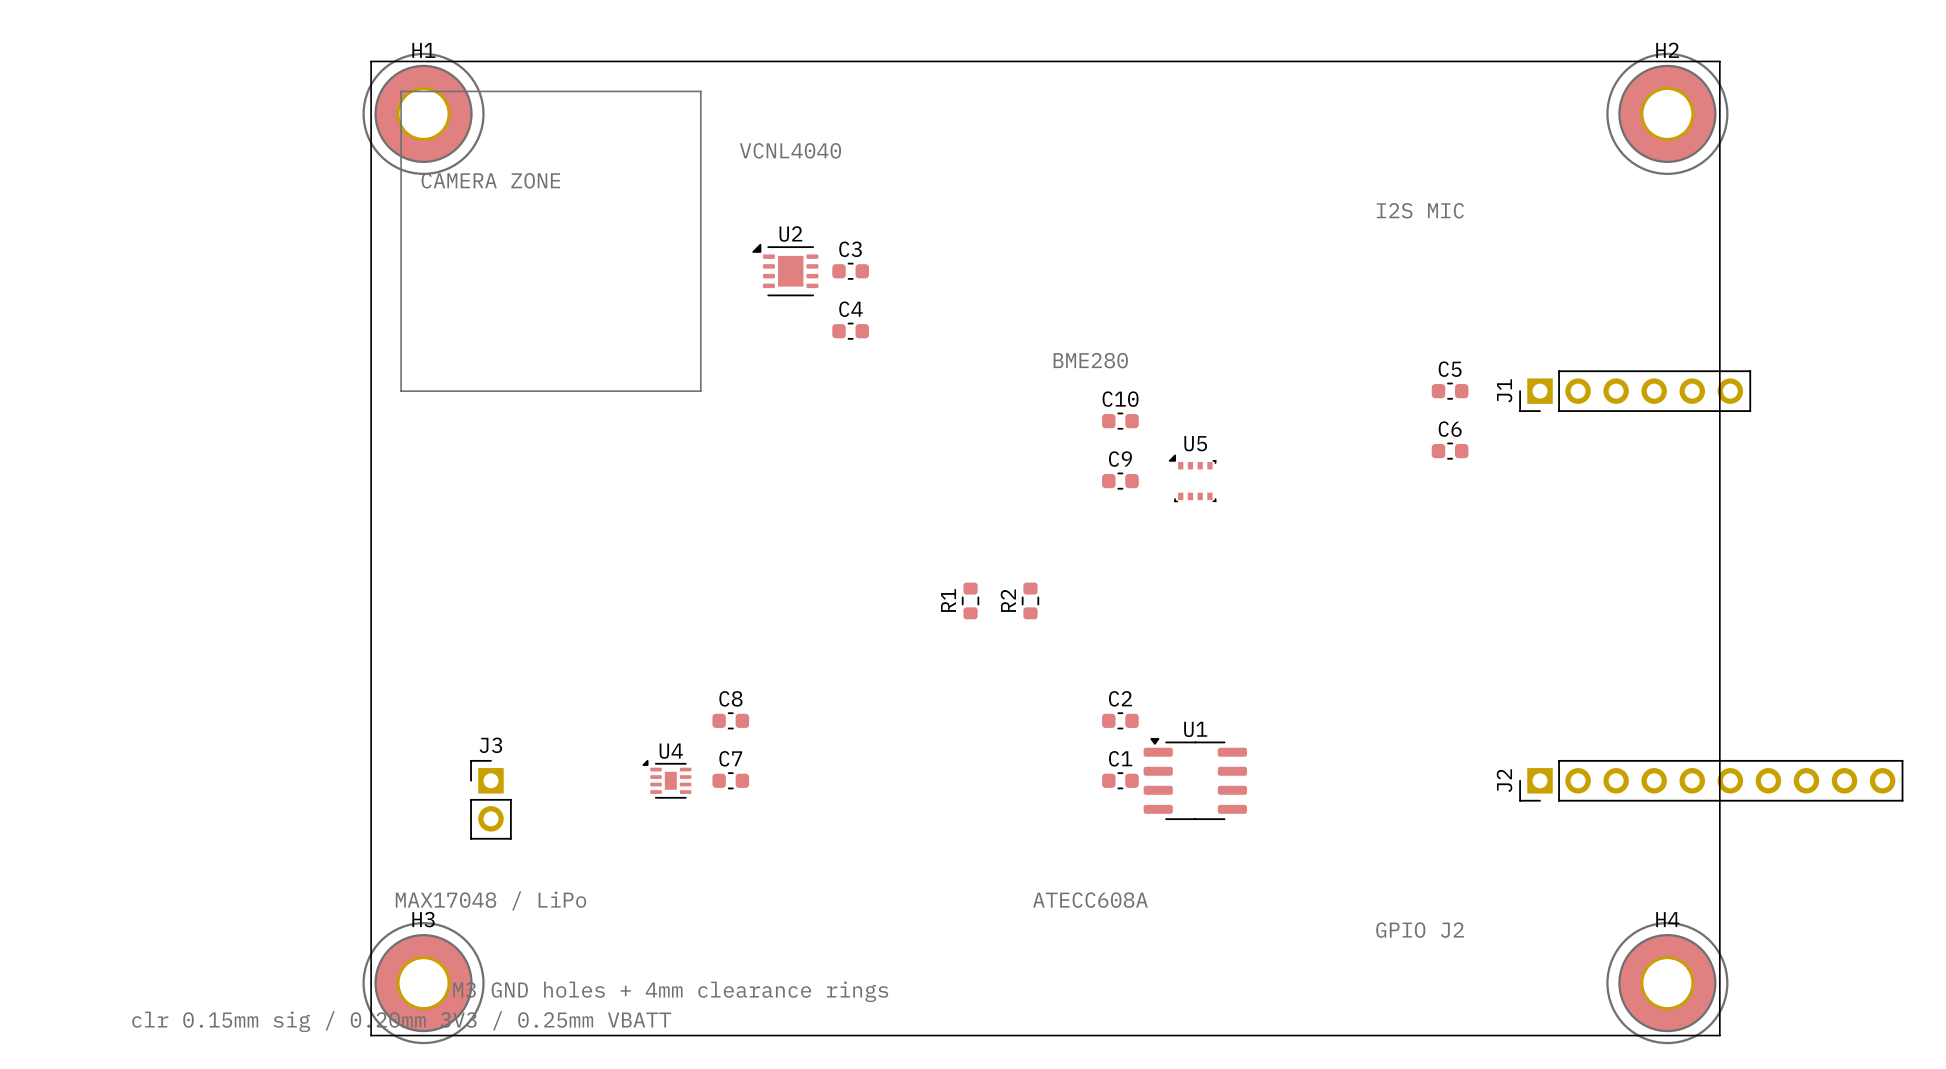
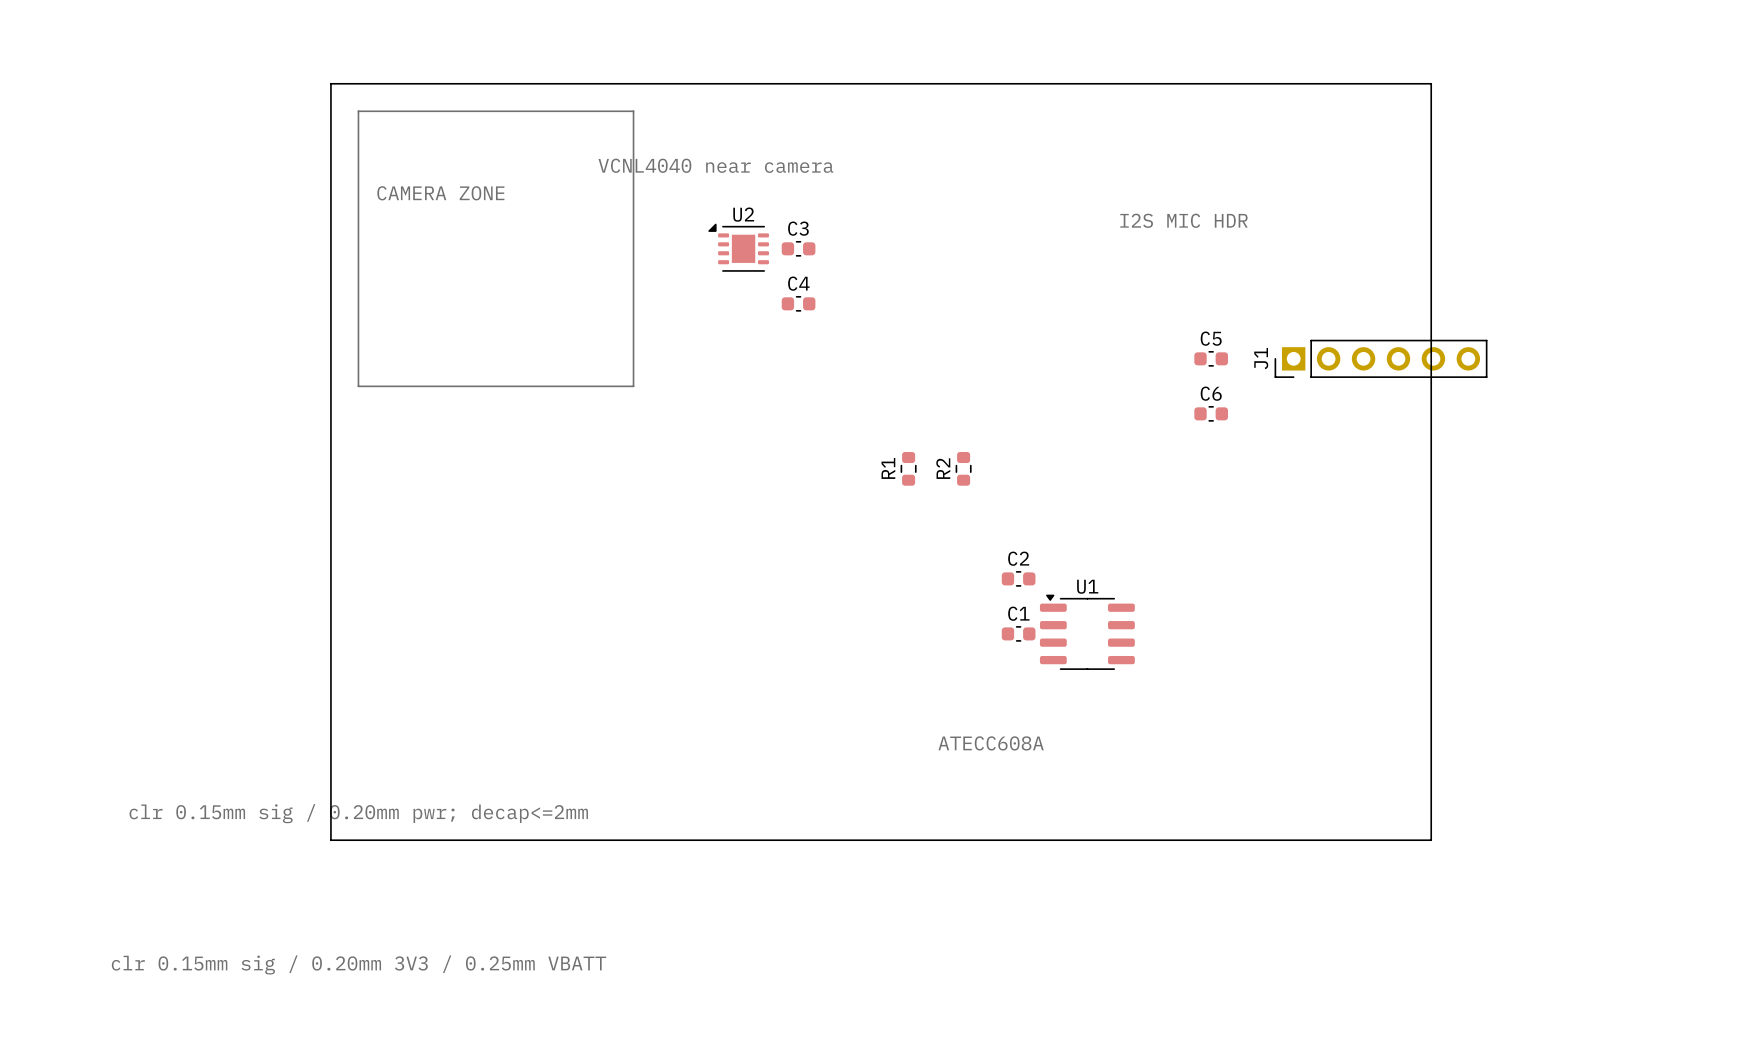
drawing: [362, 52, 485, 175] -> none
drawing: [1606, 52, 1729, 175] -> none
board edge: (1569, 61) (1719, 61) (1719, 1035) (371, 1035) (371, 885) -> (1431, 83) (1431, 840) (330, 840)
H1: (423, 113) -> none
H2: (1667, 113) -> none
text: VCNL4040 (790, 150) -> VCNL4040 near camera (715, 165)
text: I2S MIC (1420, 210) -> I2S MIC HDR (1183, 220)
U2 position: (785, 270) -> (738, 247)
C3 position: (850, 271) -> (798, 248)
C4 position: (850, 331) -> (798, 303)
text: BME280 (1090, 360) -> none
C5 position: (1450, 391) -> (1211, 358)
J1 position: (1635, 391) -> (1381, 358)
C10: (1120, 421) -> none
C6 position: (1450, 451) -> (1211, 413)
U5: (1192, 478) -> none
C9: (1120, 481) -> none
R1 position: (970, 600) -> (908, 468)
R2 position: (1030, 600) -> (963, 468)
C8: (730, 720) -> none
C2 position: (1120, 720) -> (1018, 578)
U4: (666, 779) -> none
U1 position: (1195, 779) -> (1087, 632)
C7: (730, 780) -> none
C1 position: (1120, 780) -> (1018, 633)
J2: (1711, 780) -> none
J3: (490, 799) -> none
text: none -> clr 0.15mm sig / 0.20mm pwr; decap<=2mm (358, 813)
text: MAX17048 / LiPo (491, 900) -> none
text position: ATECC608A (1090, 900) -> ATECC608A (991, 743)
drawing: [362, 922, 485, 1045] -> none
drawing: [1606, 922, 1729, 1045] -> none
text: GPIO J2 (1420, 930) -> none
H3: (423, 983) -> none
H4: (1667, 983) -> none
text: M3 GND holes + 4mm clearance rings (670, 991) -> none

